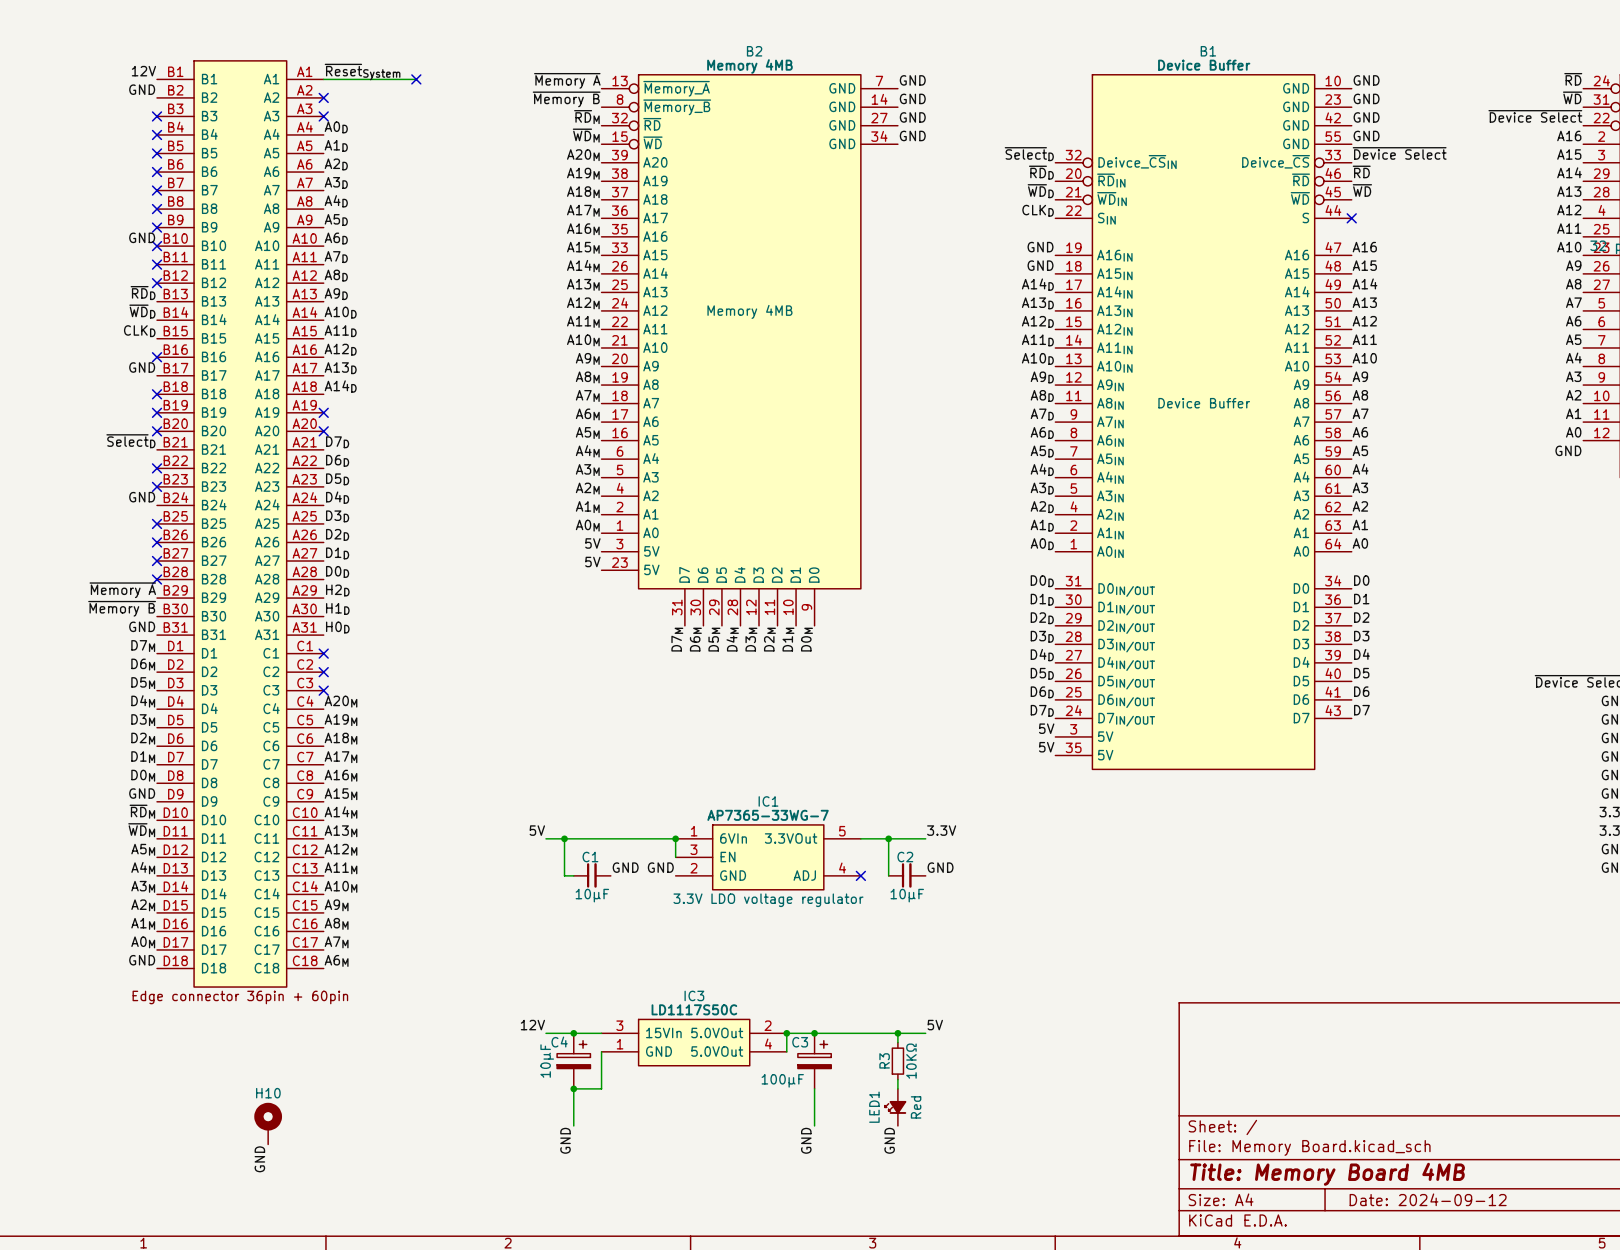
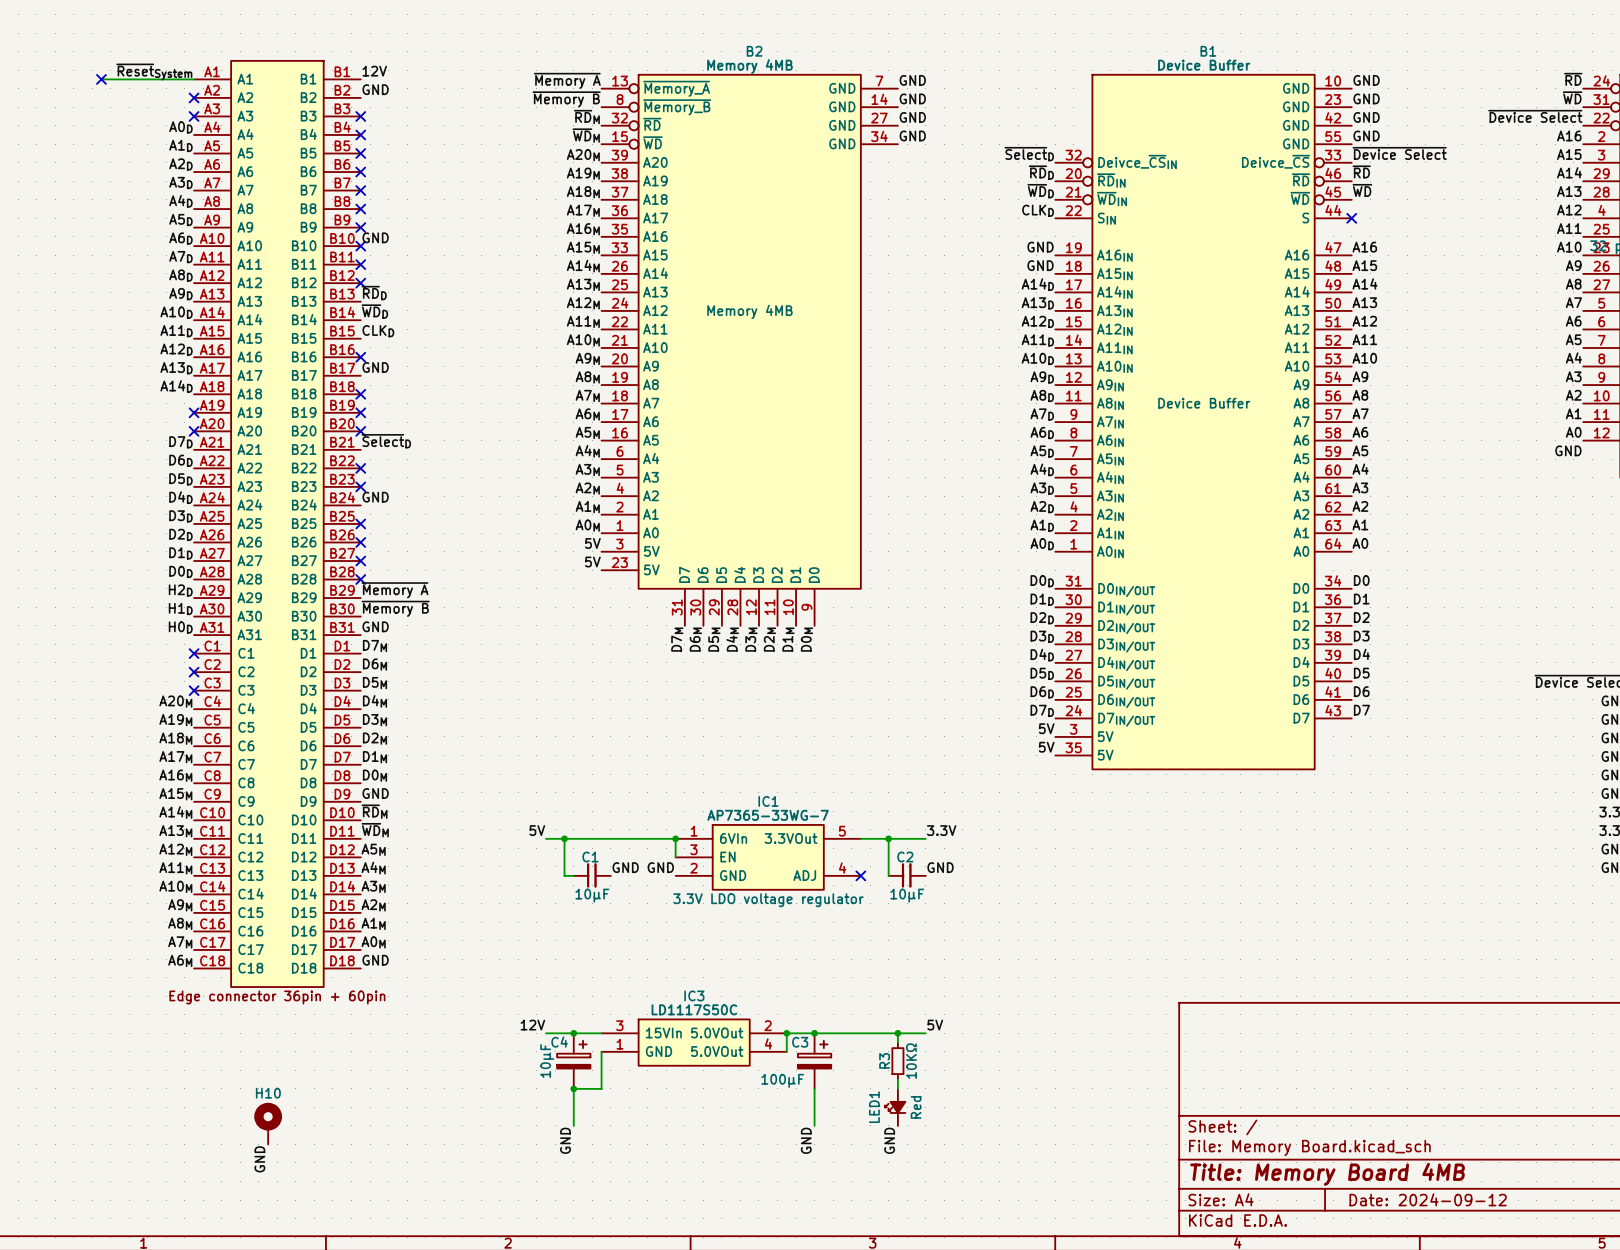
label: 12V (143, 71) -> none
label: none -> 12V (374, 71)
label position: ~{Reset}System (362, 72) -> ~{Reset}System (154, 72)
wire: none -> (101, 79) (194, 79)
no-connect mark: none -> (101, 79)
wire: (323, 79) (416, 79) -> none
no-connect mark: (416, 79) -> none
label: GND (142, 89) -> none
label: none -> GND (375, 89)
no-connect mark: none -> (194, 97)
no-connect mark: (323, 97) -> none
no-connect mark: (157, 116) -> none
no-connect mark: none -> (194, 116)
no-connect mark: (323, 116) -> none
no-connect mark: none -> (360, 116)
label position: A0D (336, 127) -> A0D (180, 127)
no-connect mark: (157, 134) -> none
no-connect mark: none -> (360, 134)
label position: A1D (336, 145) -> A1D (180, 145)
no-connect mark: (157, 153) -> none
no-connect mark: none -> (360, 153)
label position: A2D (336, 164) -> A2D (180, 164)
no-connect mark: (157, 172) -> none
no-connect mark: none -> (360, 172)
label position: A3D (336, 182) -> A3D (180, 182)
no-connect mark: (157, 190) -> none
no-connect mark: none -> (360, 190)
label position: A4D (336, 201) -> A4D (180, 201)
no-connect mark: (157, 209) -> none
no-connect mark: none -> (360, 209)
label position: A5D (336, 220) -> A5D (180, 220)
no-connect mark: (157, 227) -> none
no-connect mark: none -> (360, 227)
label: GND (142, 237) -> none
label: none -> GND (375, 237)
label position: A6D (336, 238) -> A6D (180, 238)
no-connect mark: (157, 246) -> none
no-connect mark: none -> (360, 246)
label position: A7D (336, 257) -> A7D (180, 257)
no-connect mark: (157, 264) -> none
no-connect mark: none -> (360, 264)
label position: A8D (336, 275) -> A8D (180, 275)
no-connect mark: (157, 283) -> none
no-connect mark: none -> (360, 283)
label: ~{RD}D (143, 293) -> none
label: none -> ~{RD}D (374, 293)
label position: A9D (336, 294) -> A9D (180, 294)
label: ~{WD}D (142, 311) -> none
label: none -> ~{WD}D (374, 311)
label position: A10D (340, 312) -> A10D (176, 312)
label: CLKD (139, 331) -> none
label position: A11D (340, 331) -> A11D (176, 331)
label: none -> CLKD (378, 331)
label position: A12D (340, 349) -> A12D (176, 349)
no-connect mark: (157, 357) -> none
no-connect mark: none -> (360, 357)
label: GND (142, 367) -> none
label: none -> GND (375, 367)
label position: A13D (340, 368) -> A13D (176, 368)
label position: A14D (340, 386) -> A14D (176, 386)
no-connect mark: (157, 394) -> none
no-connect mark: none -> (360, 394)
no-connect mark: (157, 412) -> none
no-connect mark: none -> (194, 412)
no-connect mark: (323, 412) -> none
no-connect mark: none -> (360, 412)
no-connect mark: (157, 431) -> none
no-connect mark: none -> (194, 431)
no-connect mark: (323, 431) -> none
no-connect mark: none -> (360, 431)
label: ~{Select}D (130, 441) -> none
label: none -> ~{Select}D (386, 441)
label position: D7D (337, 442) -> D7D (180, 442)
label position: D6D (337, 460) -> D6D (180, 460)
no-connect mark: (157, 468) -> none
no-connect mark: none -> (360, 468)
label position: D5D (337, 479) -> D5D (180, 479)
no-connect mark: (157, 486) -> none
no-connect mark: none -> (360, 486)
label: GND (142, 497) -> none
label position: D4D (337, 497) -> D4D (180, 497)
label: none -> GND (375, 497)
label position: D3D (337, 516) -> D3D (180, 516)
no-connect mark: (157, 523) -> none
part: (240, 523) -> none
part: none -> (277, 523)
no-connect mark: none -> (360, 523)
label position: D2D (337, 534) -> D2D (180, 534)
no-connect mark: (157, 542) -> none
no-connect mark: none -> (360, 542)
label position: D1D (337, 553) -> D1D (180, 553)
no-connect mark: (157, 561) -> none
no-connect mark: none -> (360, 561)
label position: D0D (337, 571) -> D0D (180, 571)
no-connect mark: (157, 579) -> none
no-connect mark: none -> (360, 579)
label: ~{Memory A} (122, 590) -> none
label position: H2D (337, 590) -> H2D (180, 590)
label: none -> ~{Memory A} (395, 590)
label: ~{Memory B} (122, 608) -> none
label: none -> ~{Memory B} (395, 608)
label position: H1D (337, 609) -> H1D (180, 609)
label: GND (142, 626) -> none
label: none -> GND (375, 626)
label position: H0D (337, 627) -> H0D (180, 627)
label: D7M (143, 646) -> none
label: none -> D7M (374, 646)
no-connect mark: none -> (194, 653)
no-connect mark: (323, 653) -> none
label: D6M (143, 664) -> none
label: none -> D6M (374, 664)
no-connect mark: none -> (194, 672)
no-connect mark: (323, 672) -> none
label: D5M (143, 683) -> none
label: none -> D5M (374, 683)
no-connect mark: none -> (194, 690)
no-connect mark: (323, 690) -> none
label: D4M (143, 701) -> none
label position: A20M (341, 701) -> A20M (175, 701)
label: none -> D4M (374, 701)
label: D3M (143, 720) -> none
label position: A19M (341, 720) -> A19M (175, 720)
label: none -> D3M (374, 720)
label: D2M (143, 738) -> none
label position: A18M (341, 738) -> A18M (175, 738)
label: none -> D2M (374, 738)
label: D1M (143, 757) -> none
label position: A17M (341, 757) -> A17M (175, 757)
label: none -> D1M (374, 757)
label: D0M (143, 775) -> none
label position: A16M (341, 775) -> A16M (175, 775)
label: none -> D0M (374, 775)
label: GND (142, 793) -> none
label: none -> GND (375, 793)
label position: A15M (341, 794) -> A15M (175, 794)
label: ~{RD}M (142, 811) -> none
label: none -> ~{RD}M (374, 811)
label position: A14M (341, 812) -> A14M (175, 812)
label: ~{WD}M (141, 830) -> none
label: none -> ~{WD}M (375, 830)
label position: A13M (341, 831) -> A13M (175, 831)
label: A5M (143, 849) -> none
label position: A12M (341, 849) -> A12M (175, 849)
label: none -> A5M (373, 849)
label: A4M (143, 868) -> none
label position: A11M (341, 868) -> A11M (175, 868)
label: none -> A4M (373, 868)
label: A3M (143, 886) -> none
label position: A10M (341, 886) -> A10M (175, 886)
label: none -> A3M (373, 886)
label: A2M (143, 905) -> none
label position: A9M (336, 905) -> A9M (180, 905)
label: none -> A2M (373, 905)
label: A1M (143, 923) -> none
label position: A8M (336, 923) -> A8M (180, 923)
label: none -> A1M (373, 923)
label: A0M (143, 942) -> none
label position: A7M (336, 942) -> A7M (180, 942)
label: none -> A0M (373, 942)
label: GND (142, 960) -> none
label position: A6M (336, 960) -> A6M (180, 960)
label: none -> GND (375, 960)

